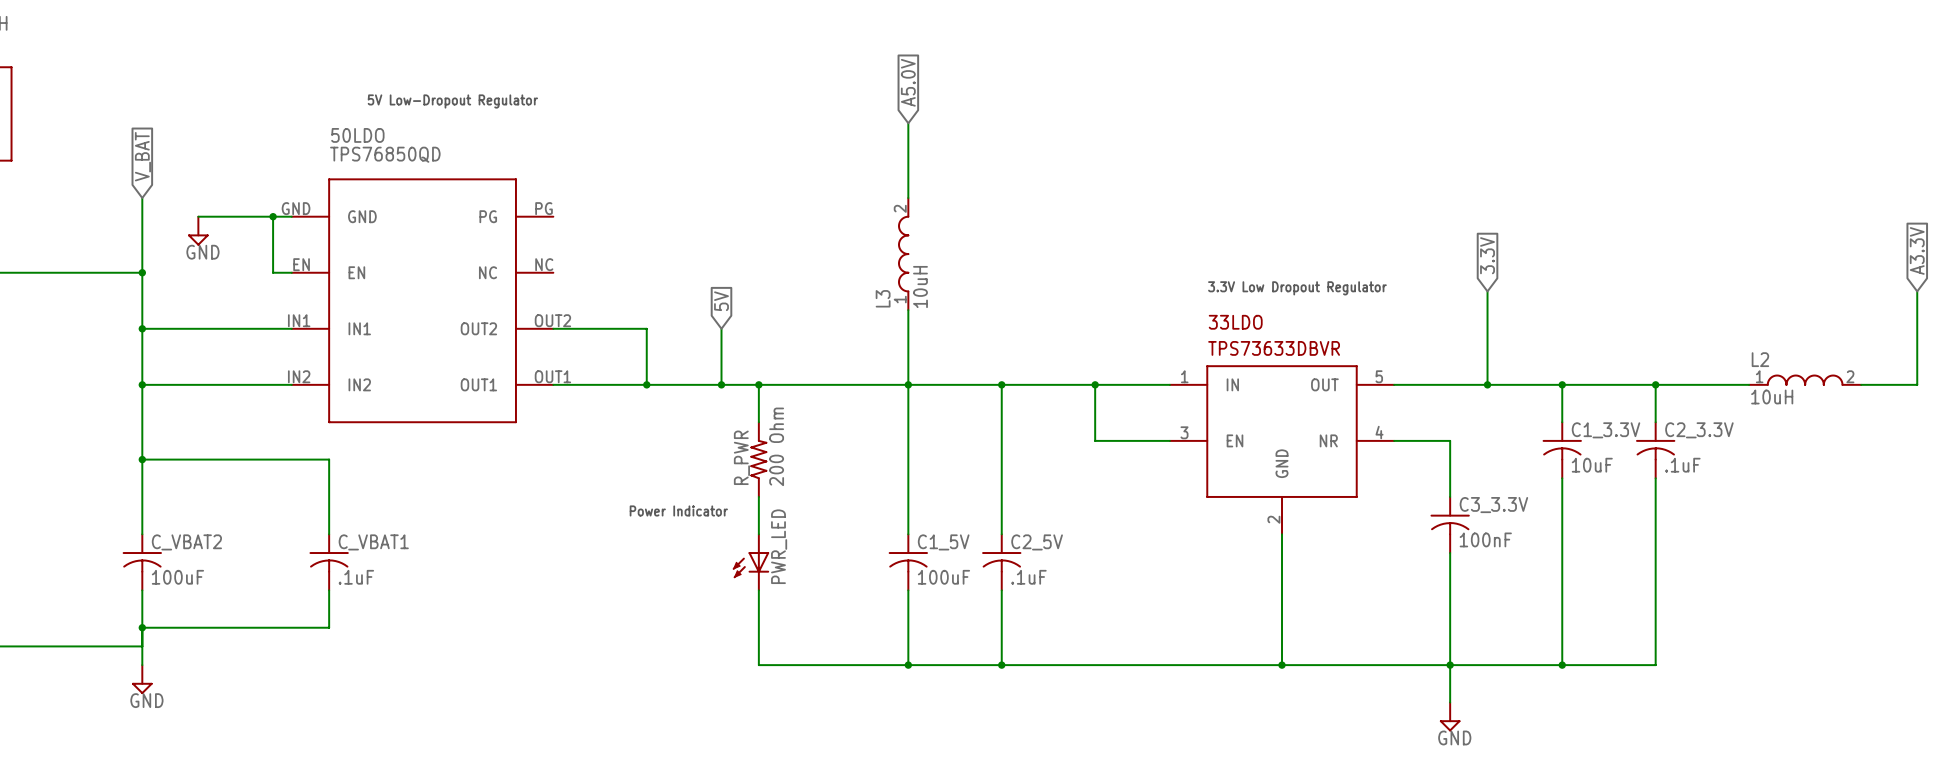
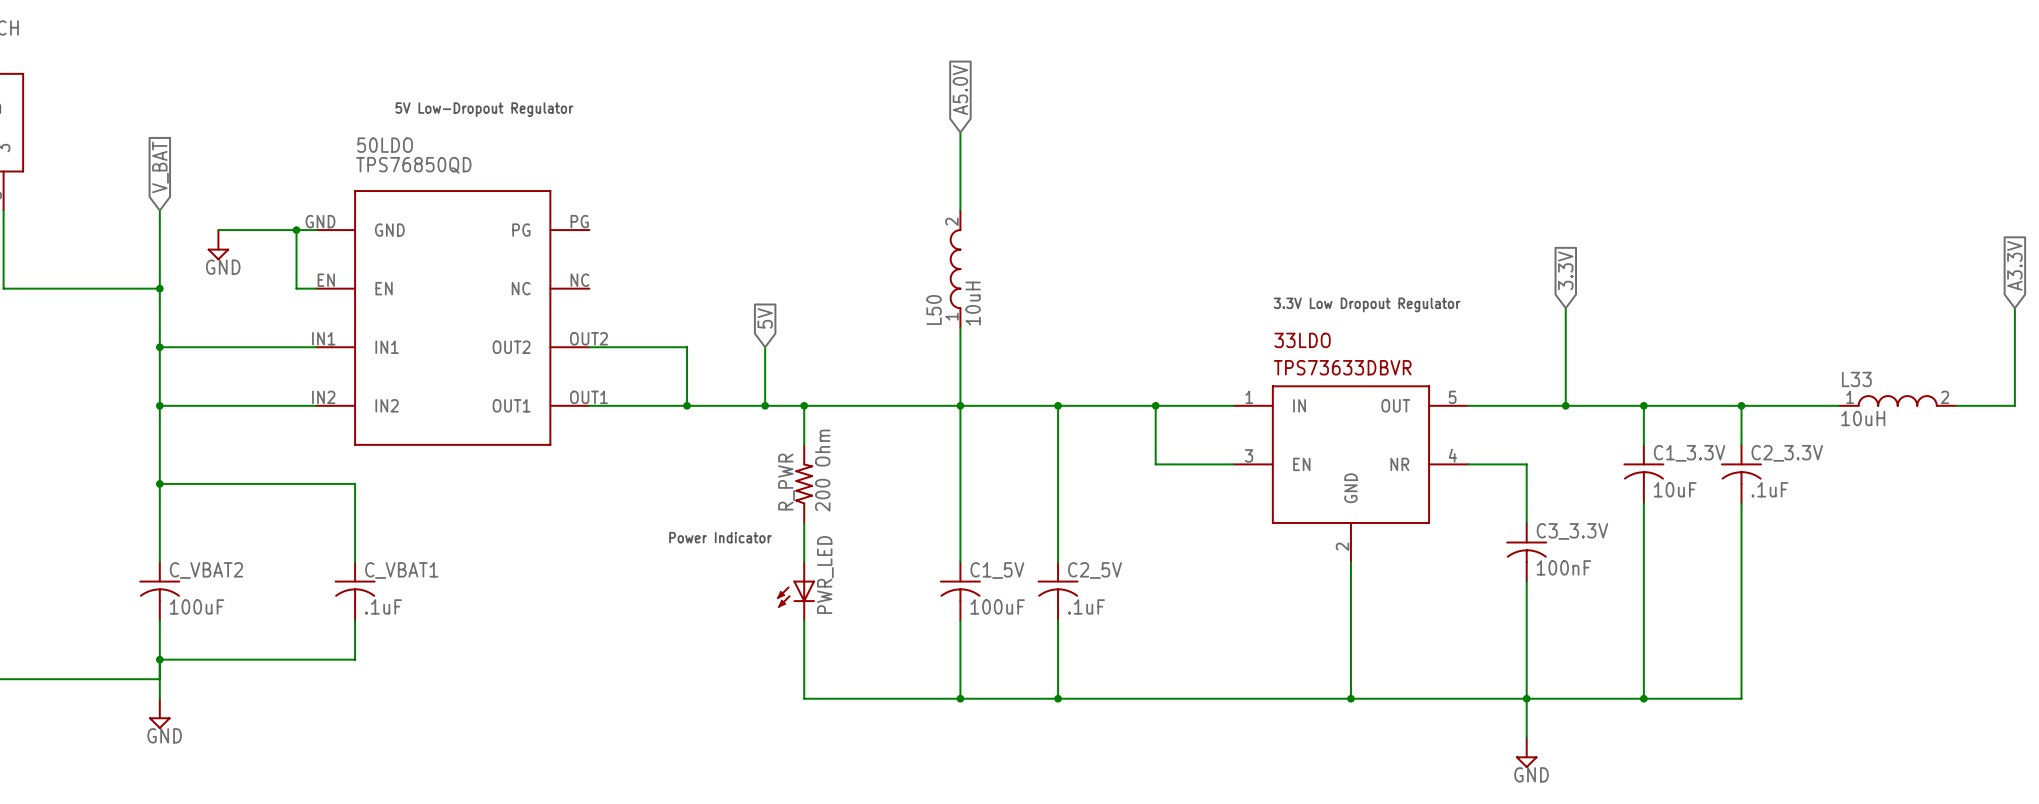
L3 name: L3 (883, 298) -> L50 (934, 310)
L2 name: L2 (1760, 359) -> L33 (1856, 379)

